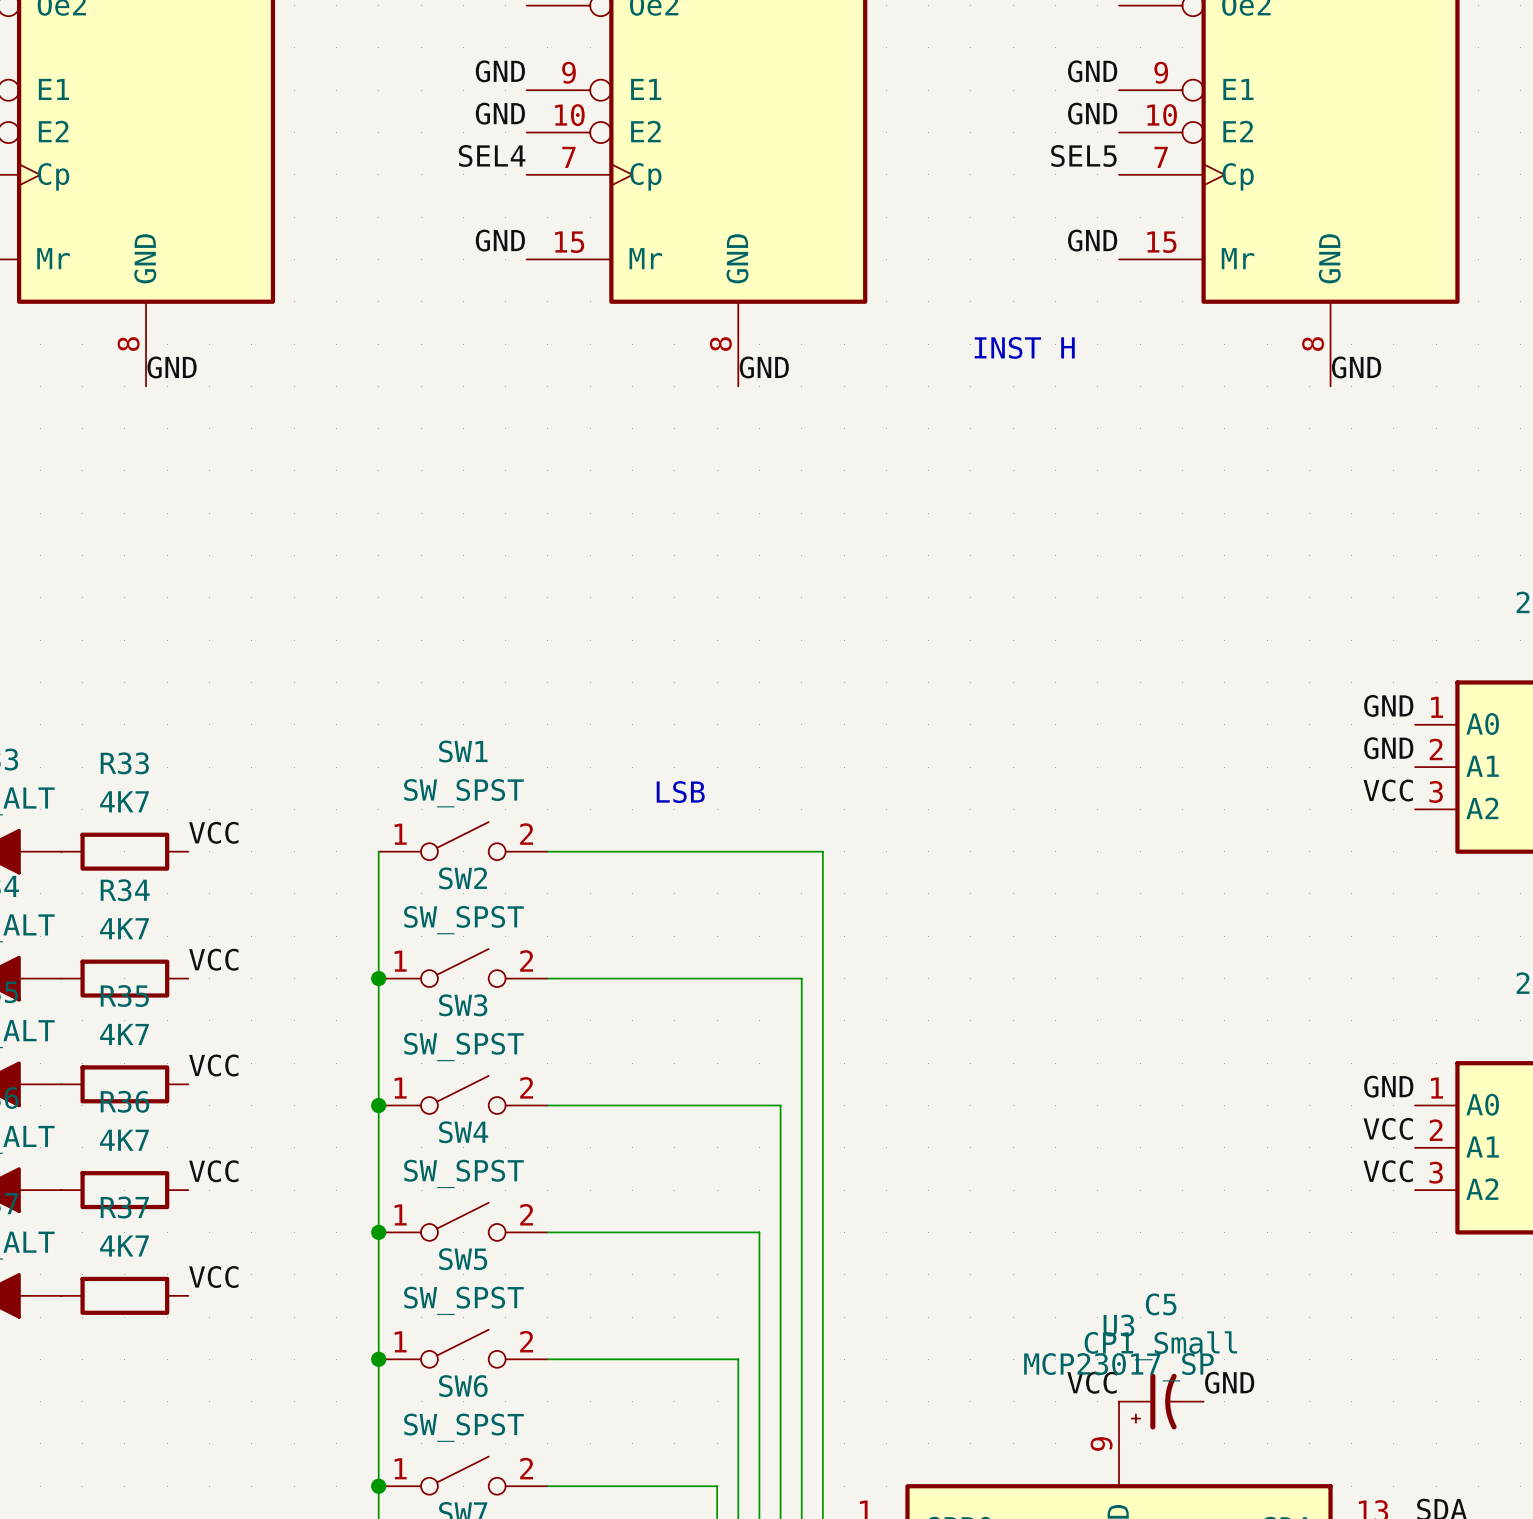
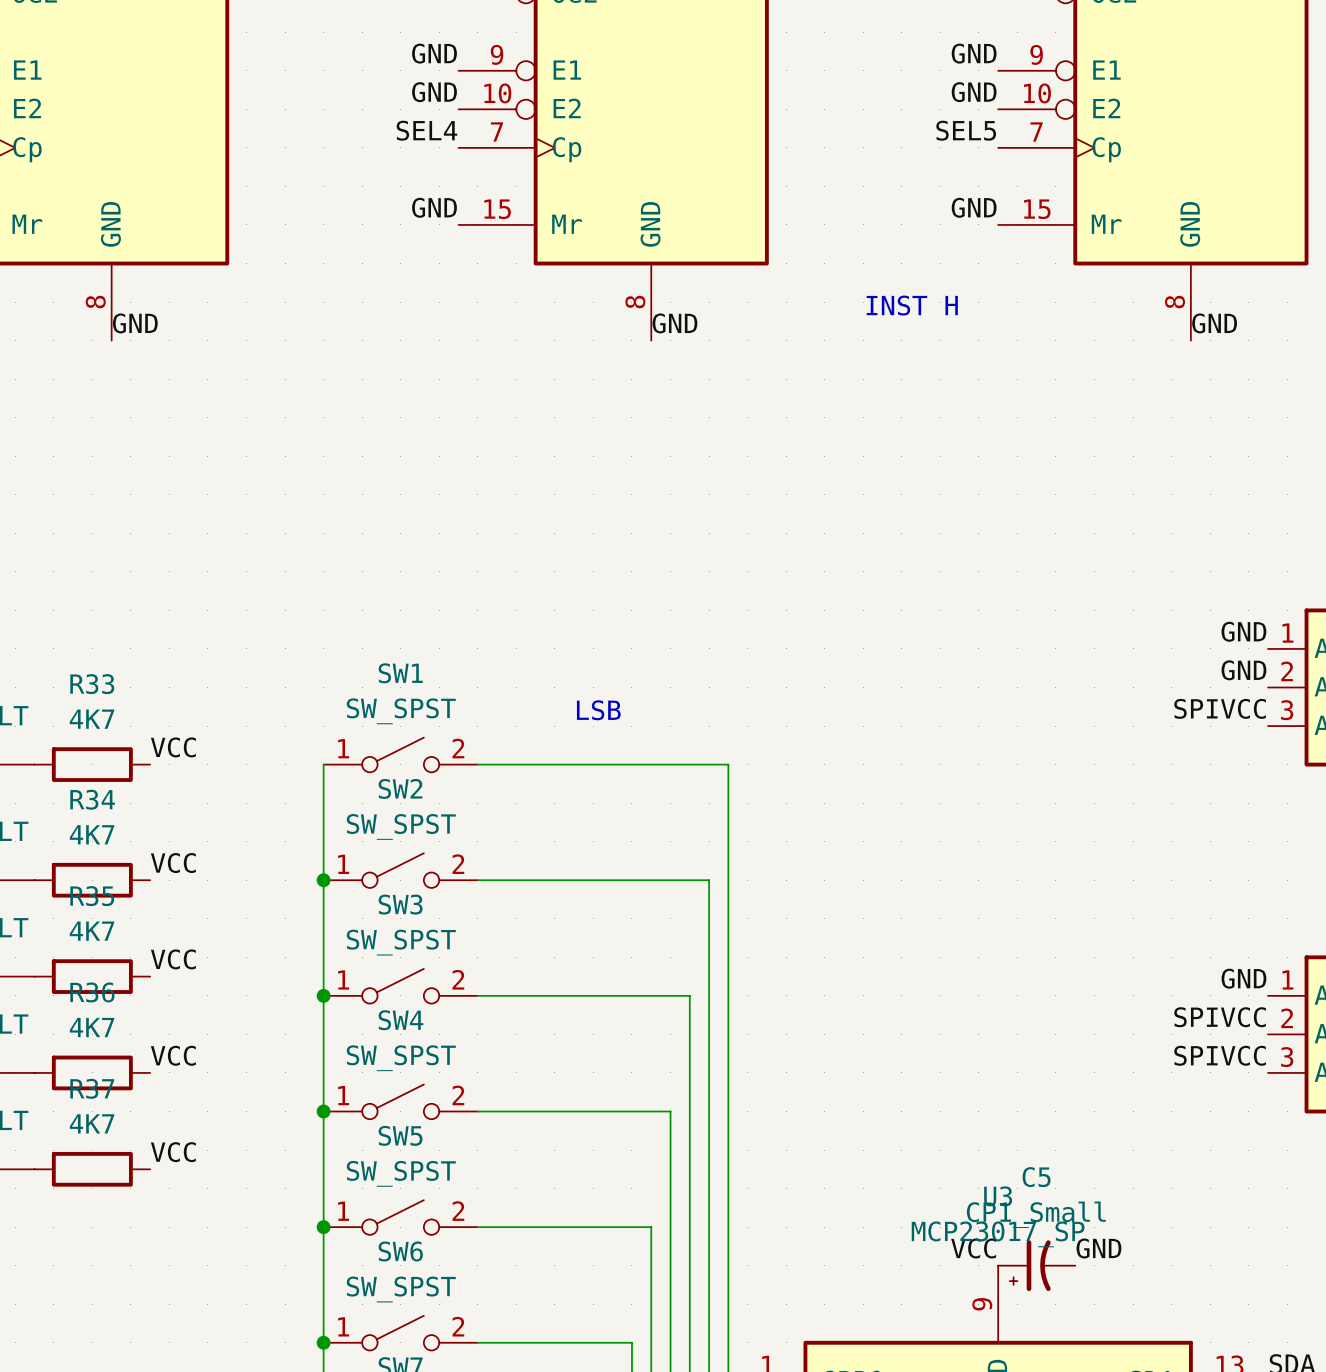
label: VCC (1388, 790) -> SPIVCC (1220, 708)
label: VCC (1388, 1128) -> SPIVCC (1220, 1017)
label: VCC (1388, 1171) -> SPIVCC (1220, 1055)

